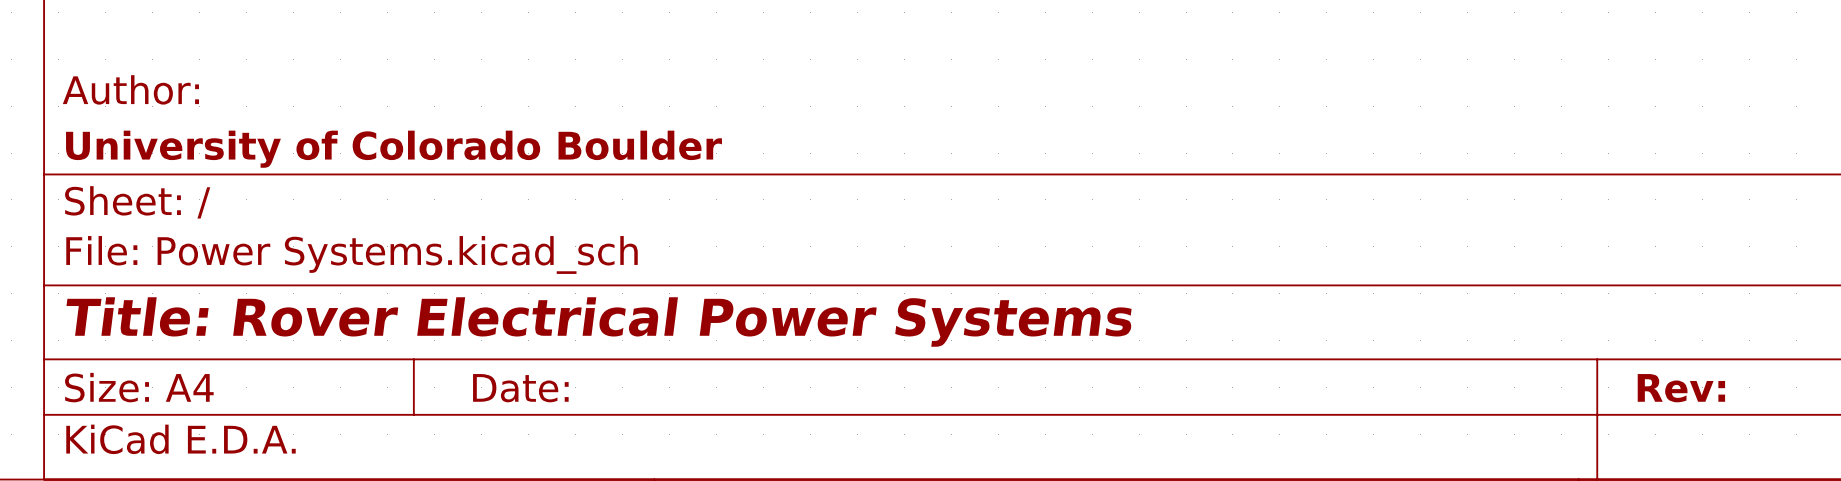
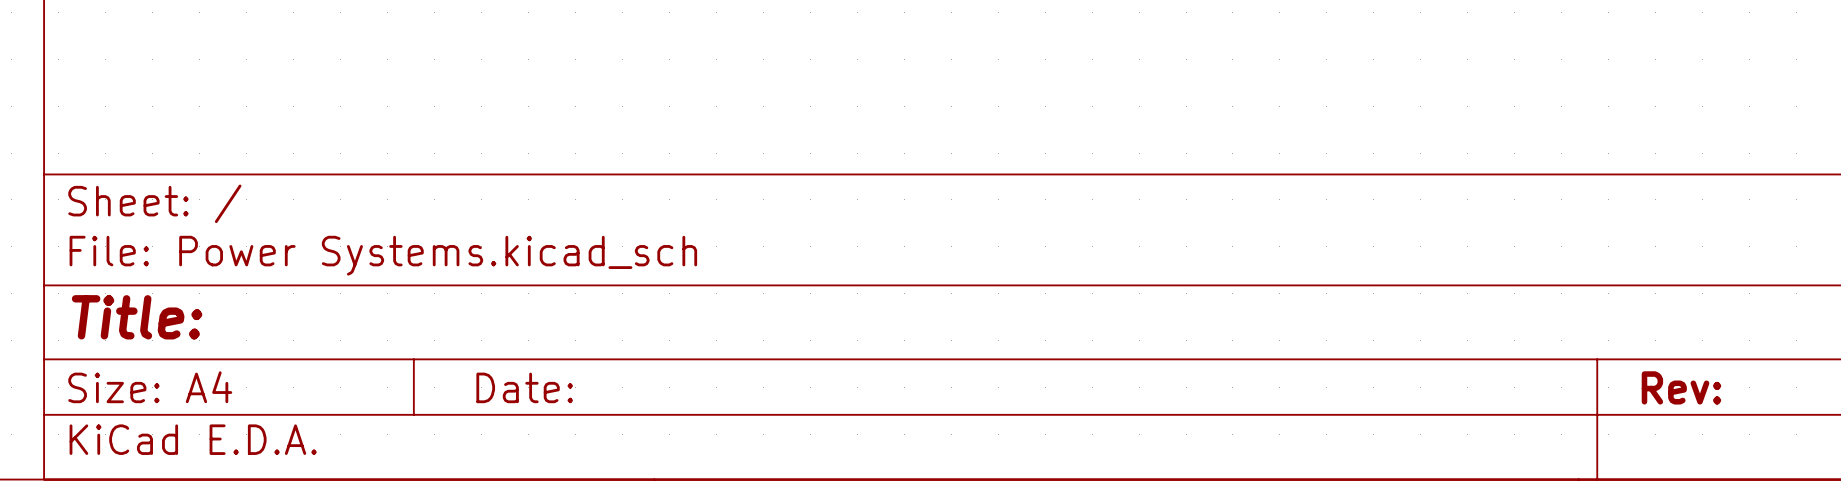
title block: Author: (130, 89) -> none
title block: University of Colorado Boulder (394, 149) -> none
title block: Title: Rover Electrical Power Systems (599, 321) -> Title: (137, 317)

